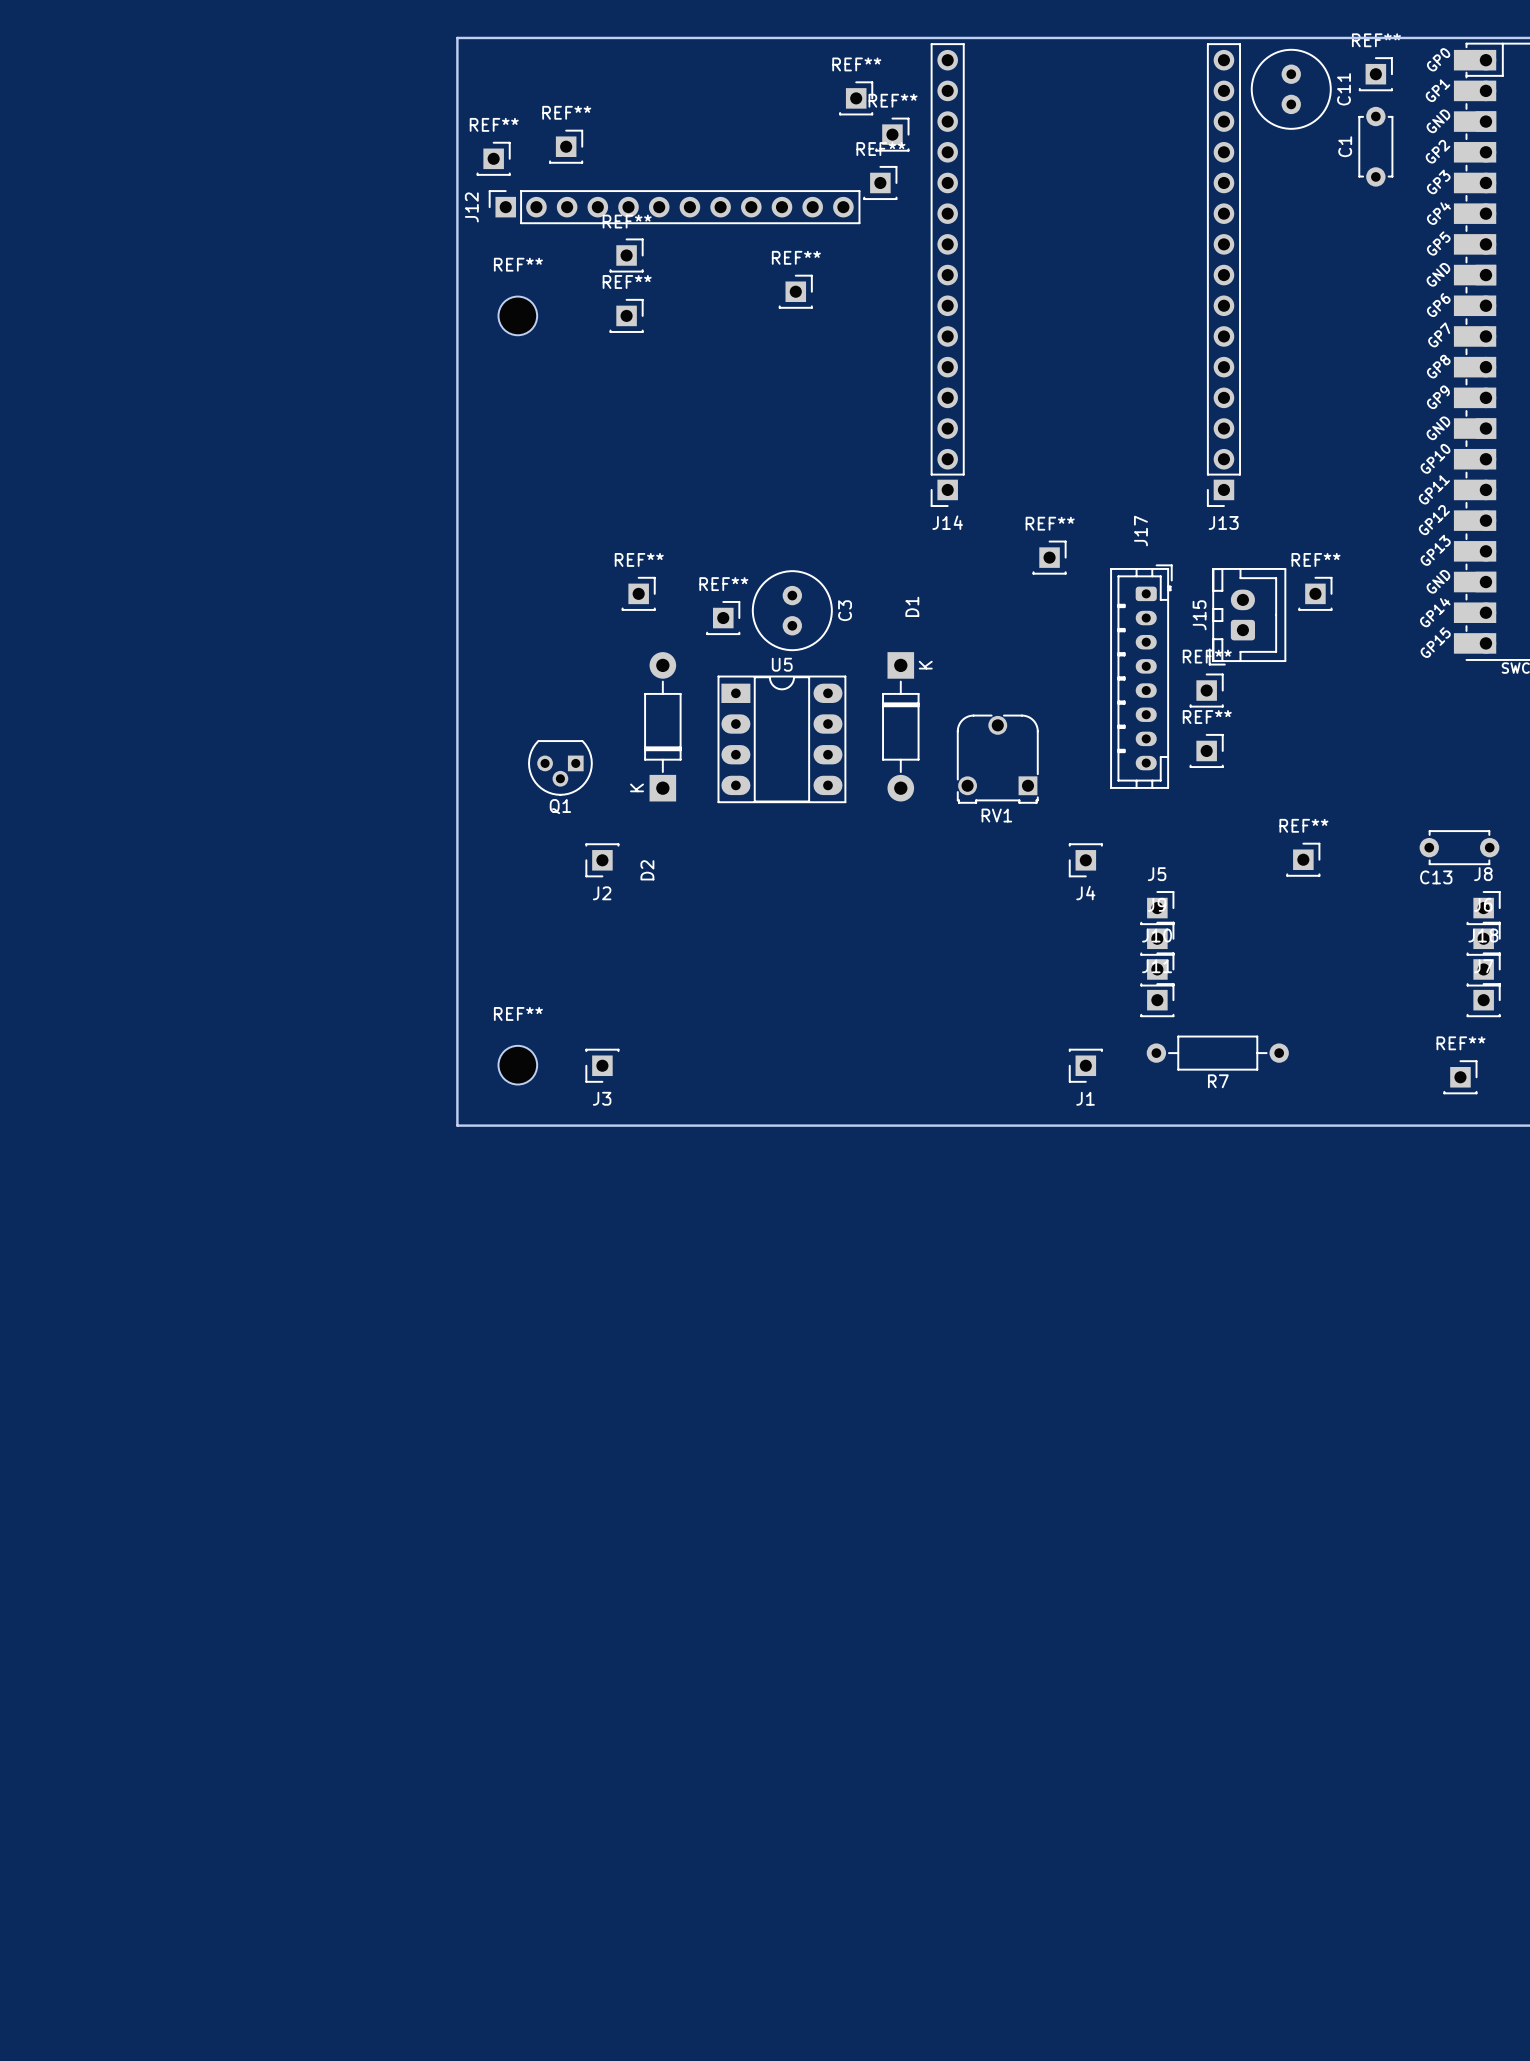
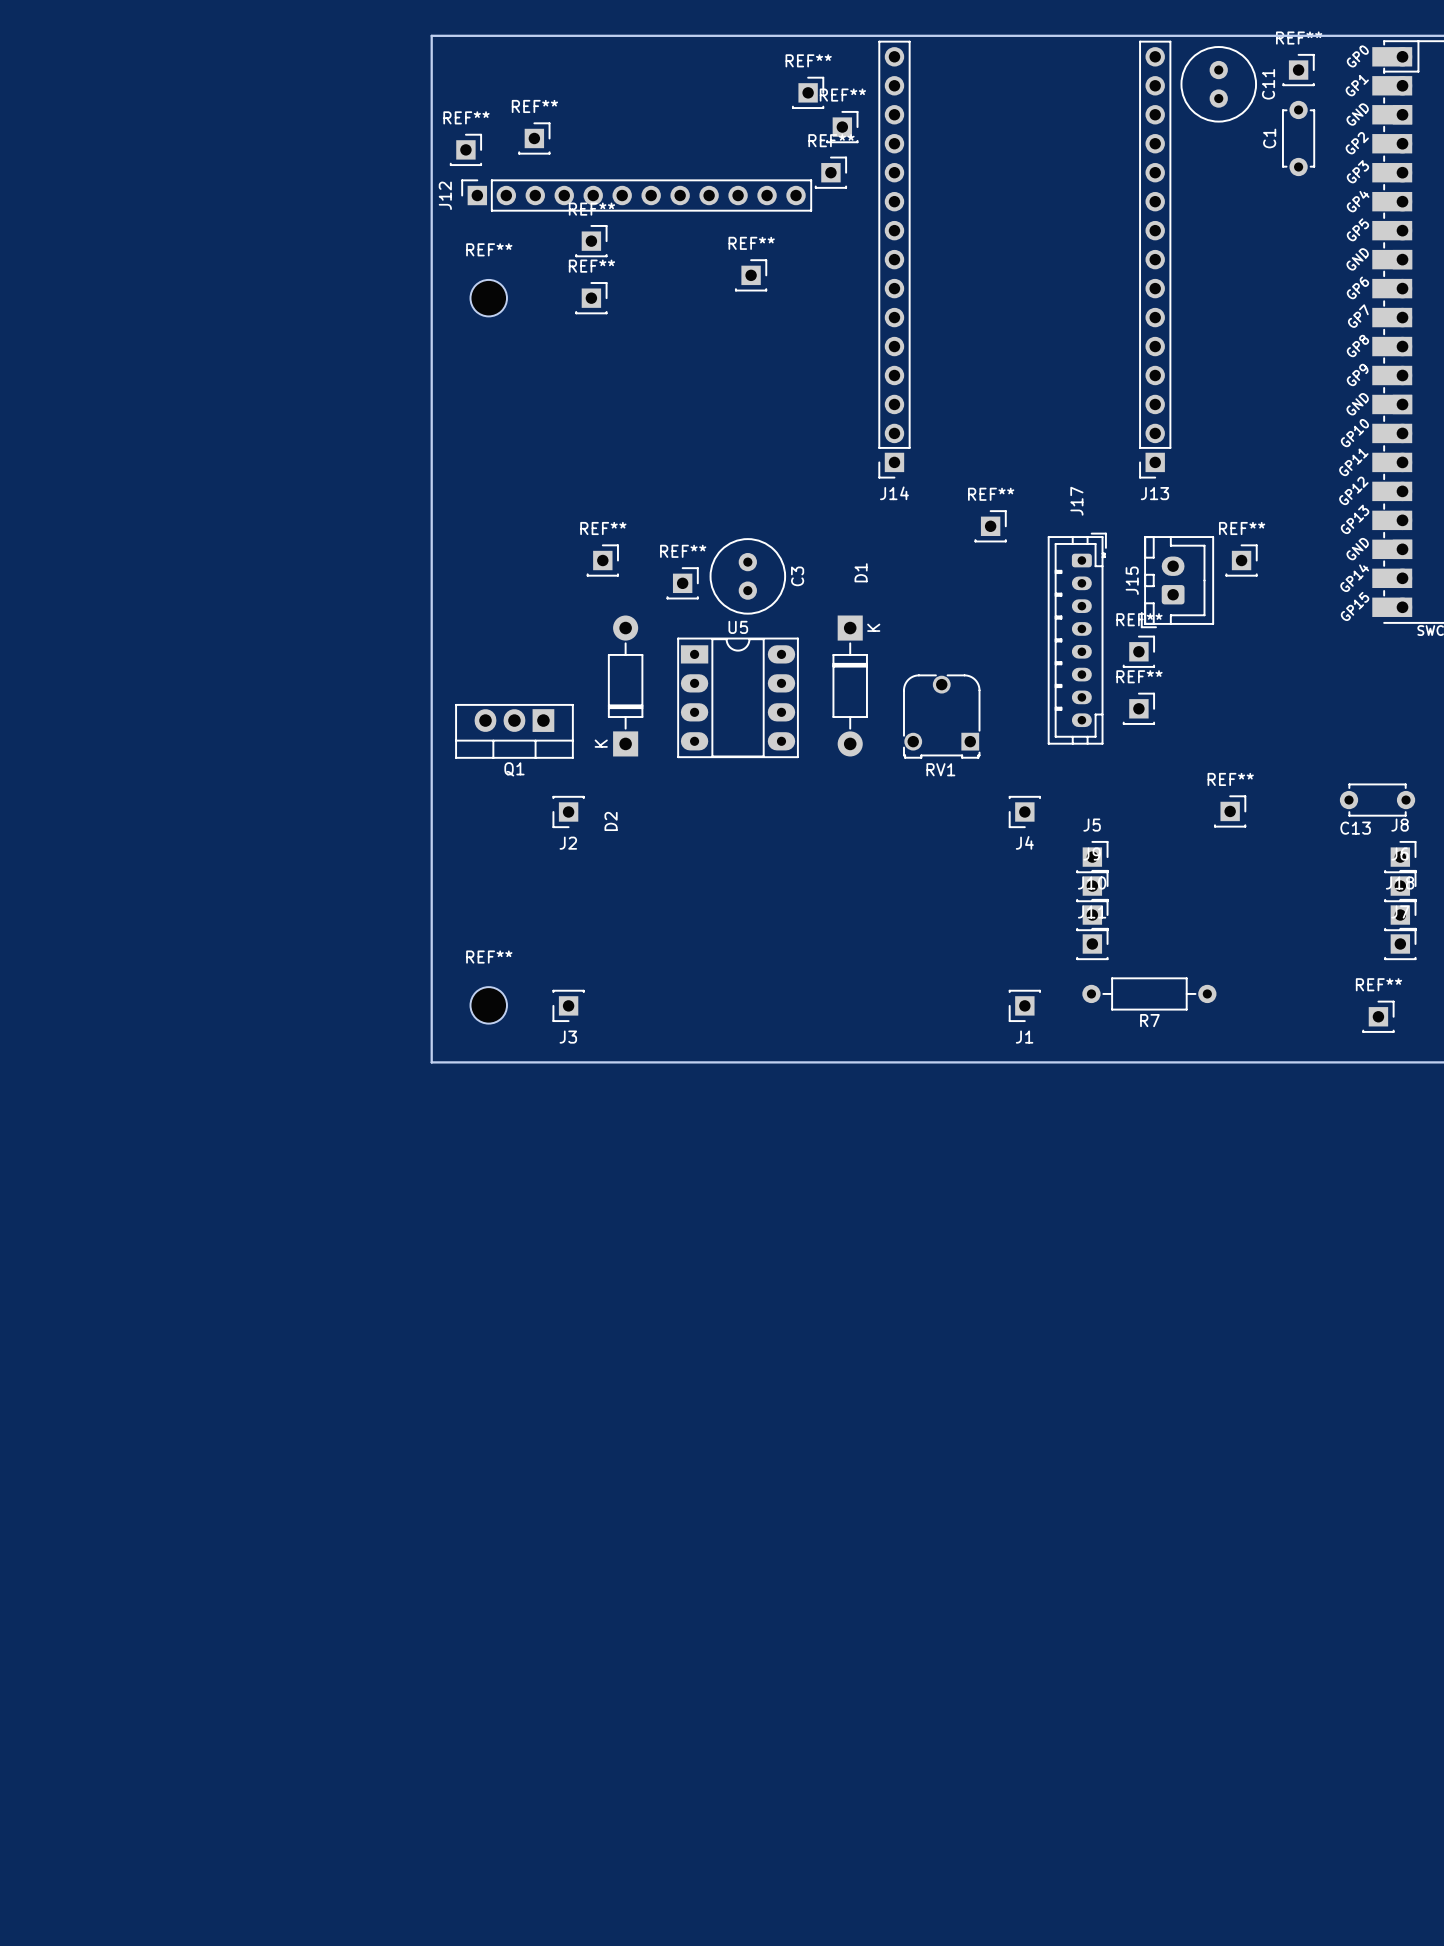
Q1 footprint: [528, 740, 593, 796] -> [455, 704, 574, 759]

